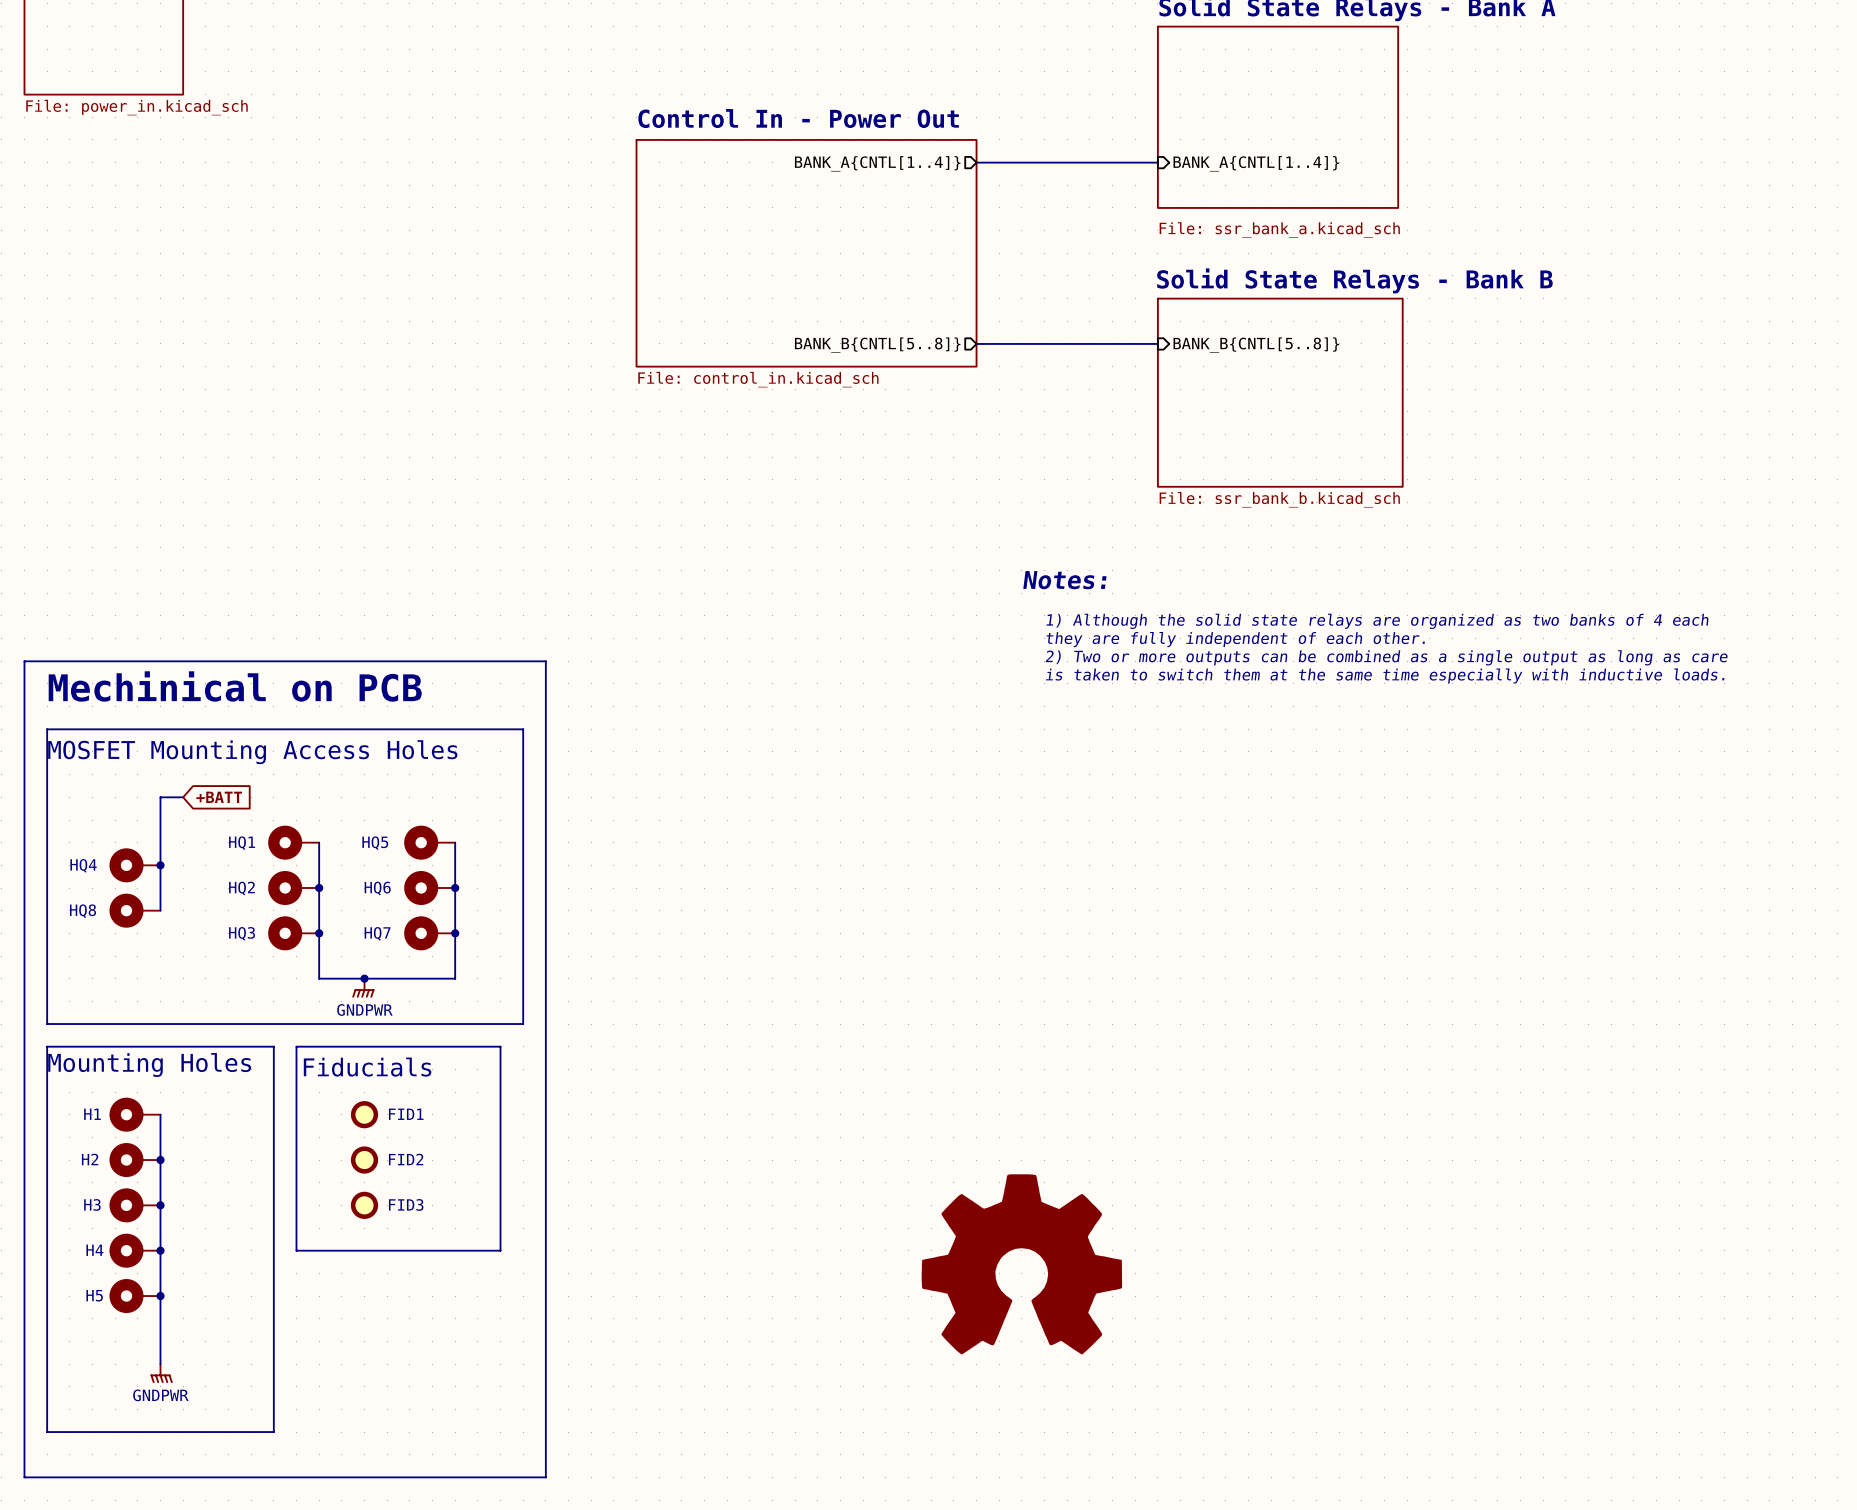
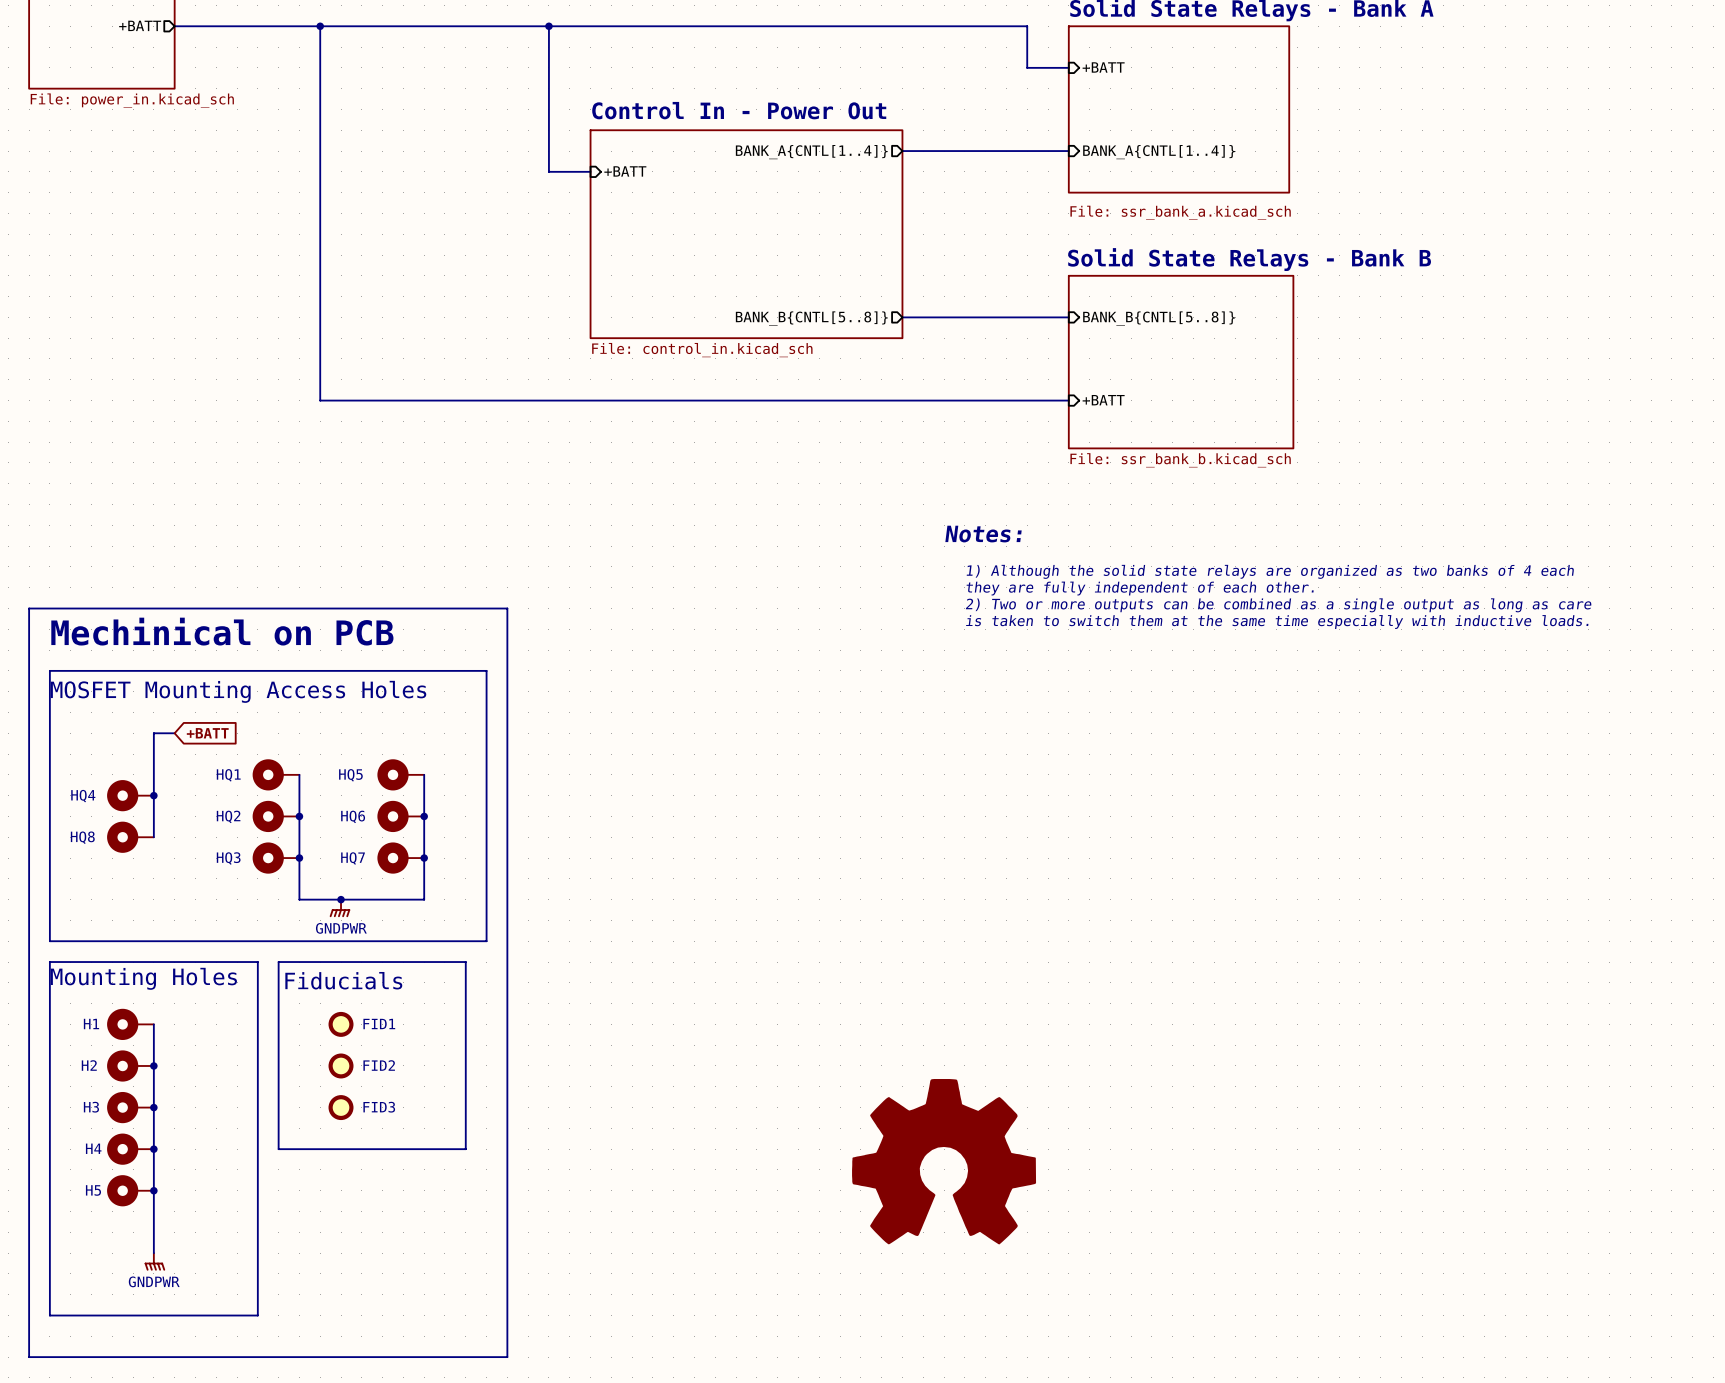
sheet pin: none -> +BATT (140, 25)
wire: none -> (174, 26) (1027, 26) (1027, 67) (1068, 67)
wire: none -> (320, 26) (320, 400) (1068, 400)
junction: none -> (320, 26)
wire: none -> (548, 26) (548, 171) (590, 171)
junction: none -> (548, 26)
sheet pin: none -> +BATT (1103, 67)
sheet pin: none -> +BATT (625, 171)
sheet pin: none -> +BATT (1103, 400)

